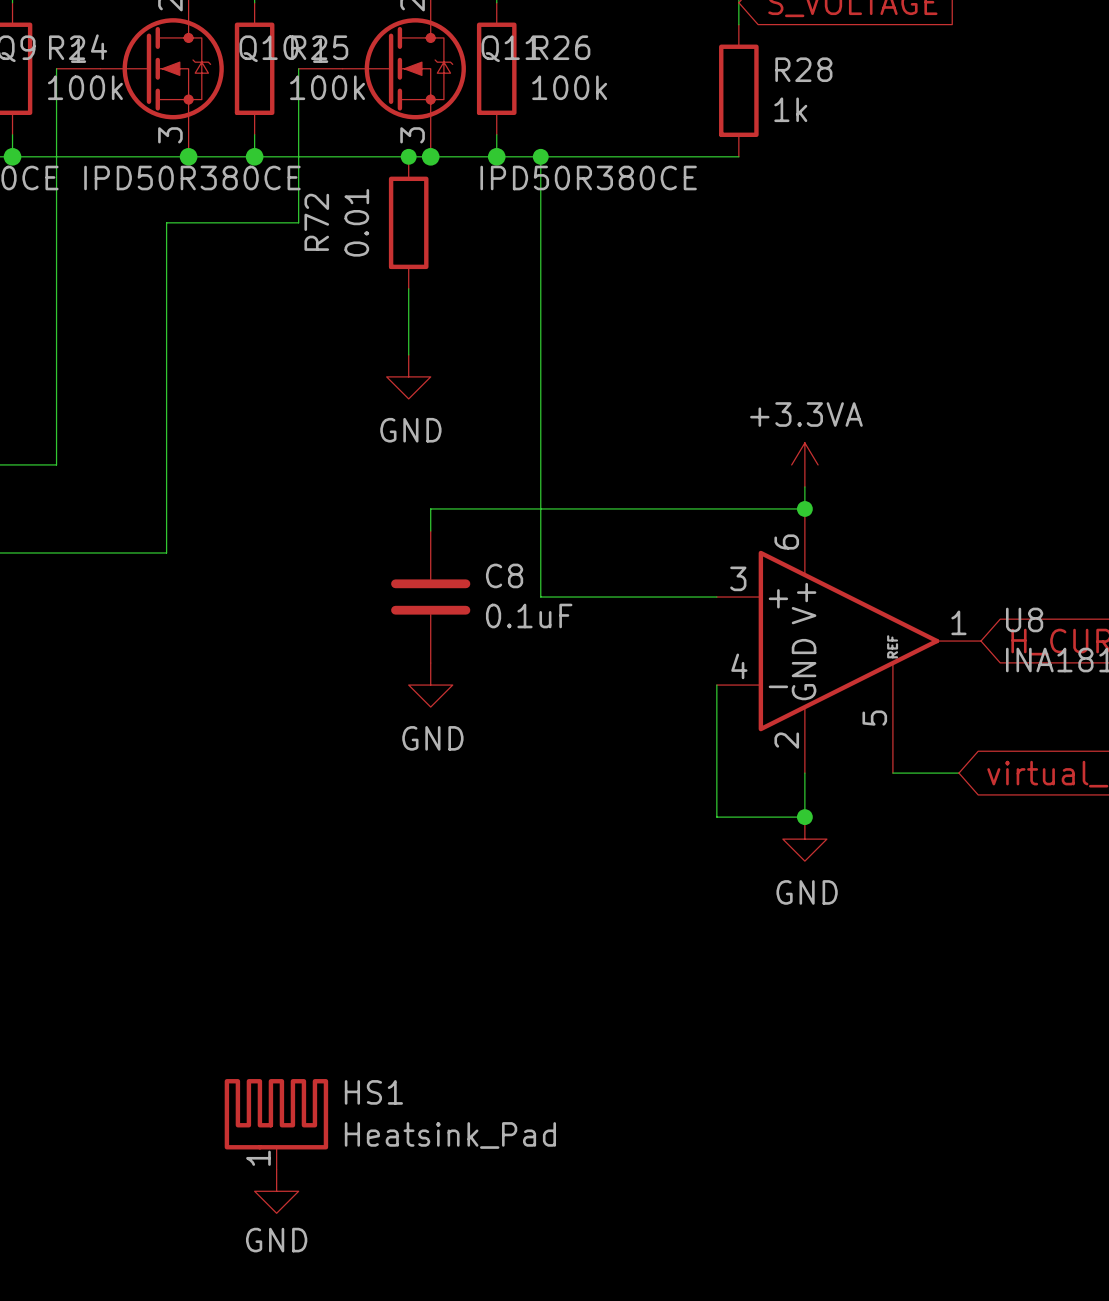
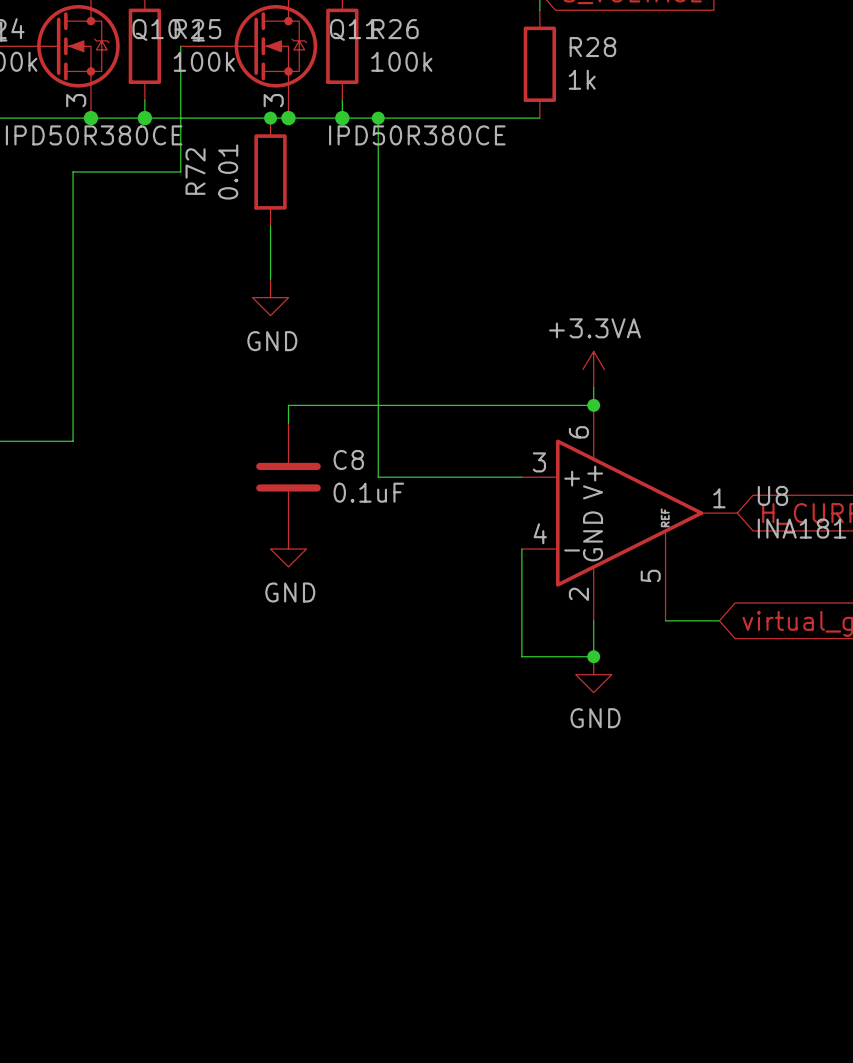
HS1: Heatsink_Pad (276, 1124) -> none
power symbol: GND (276, 1191) -> none

